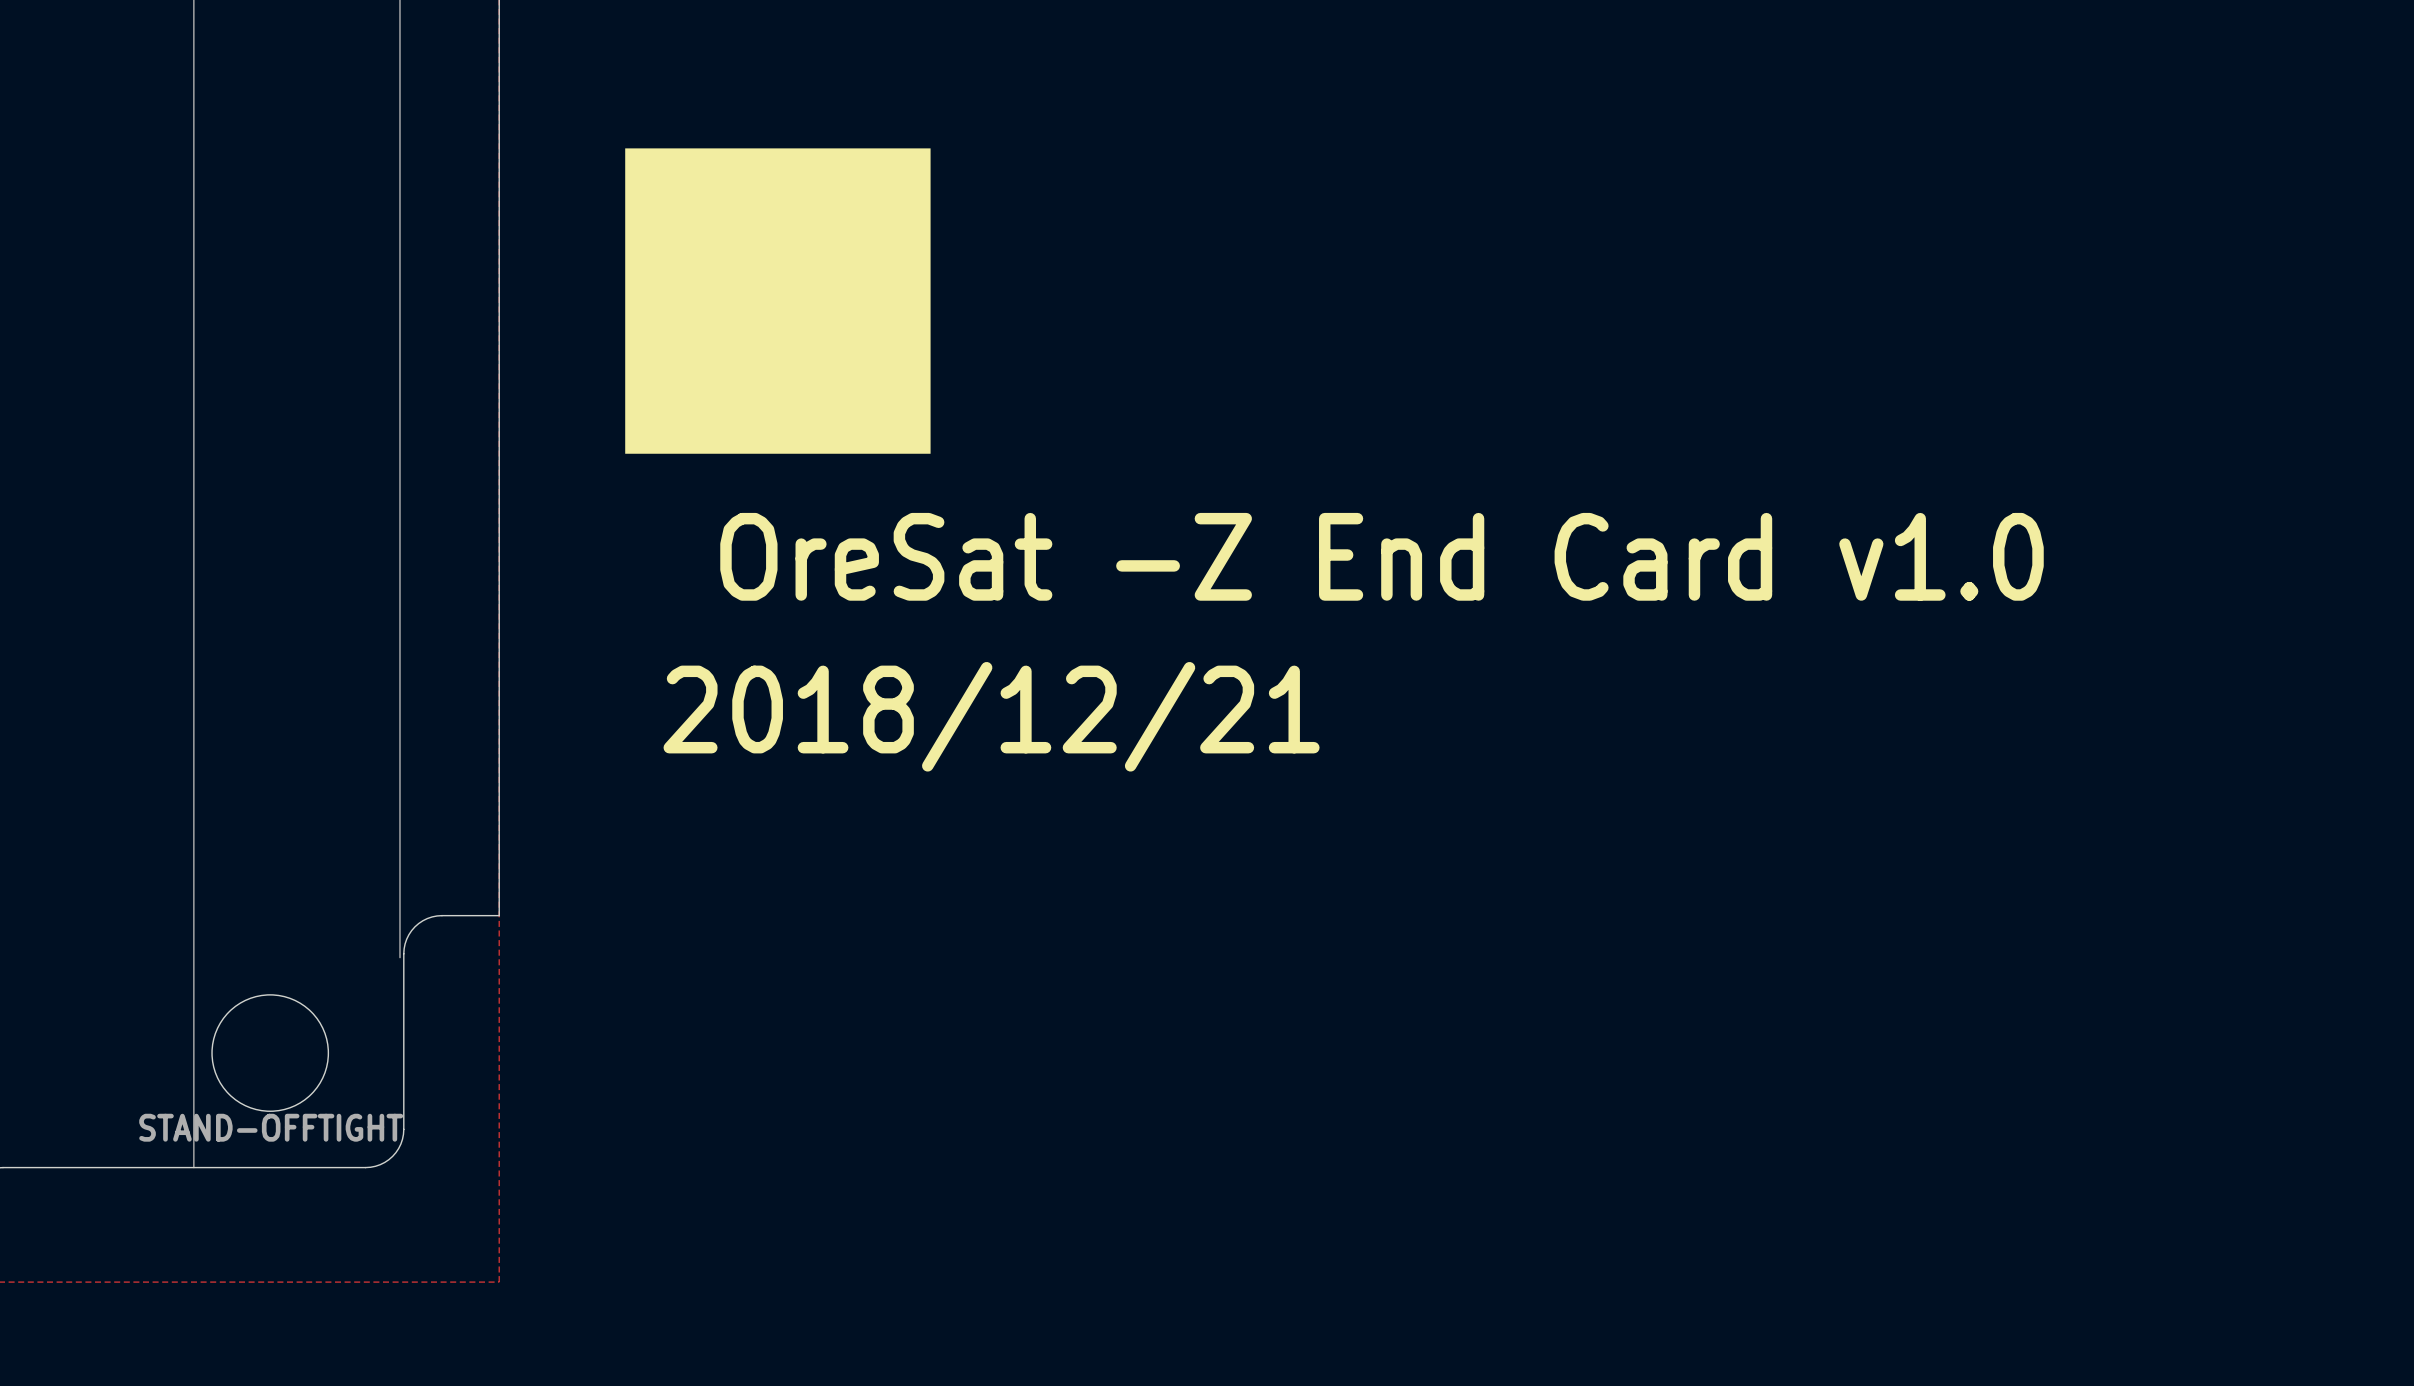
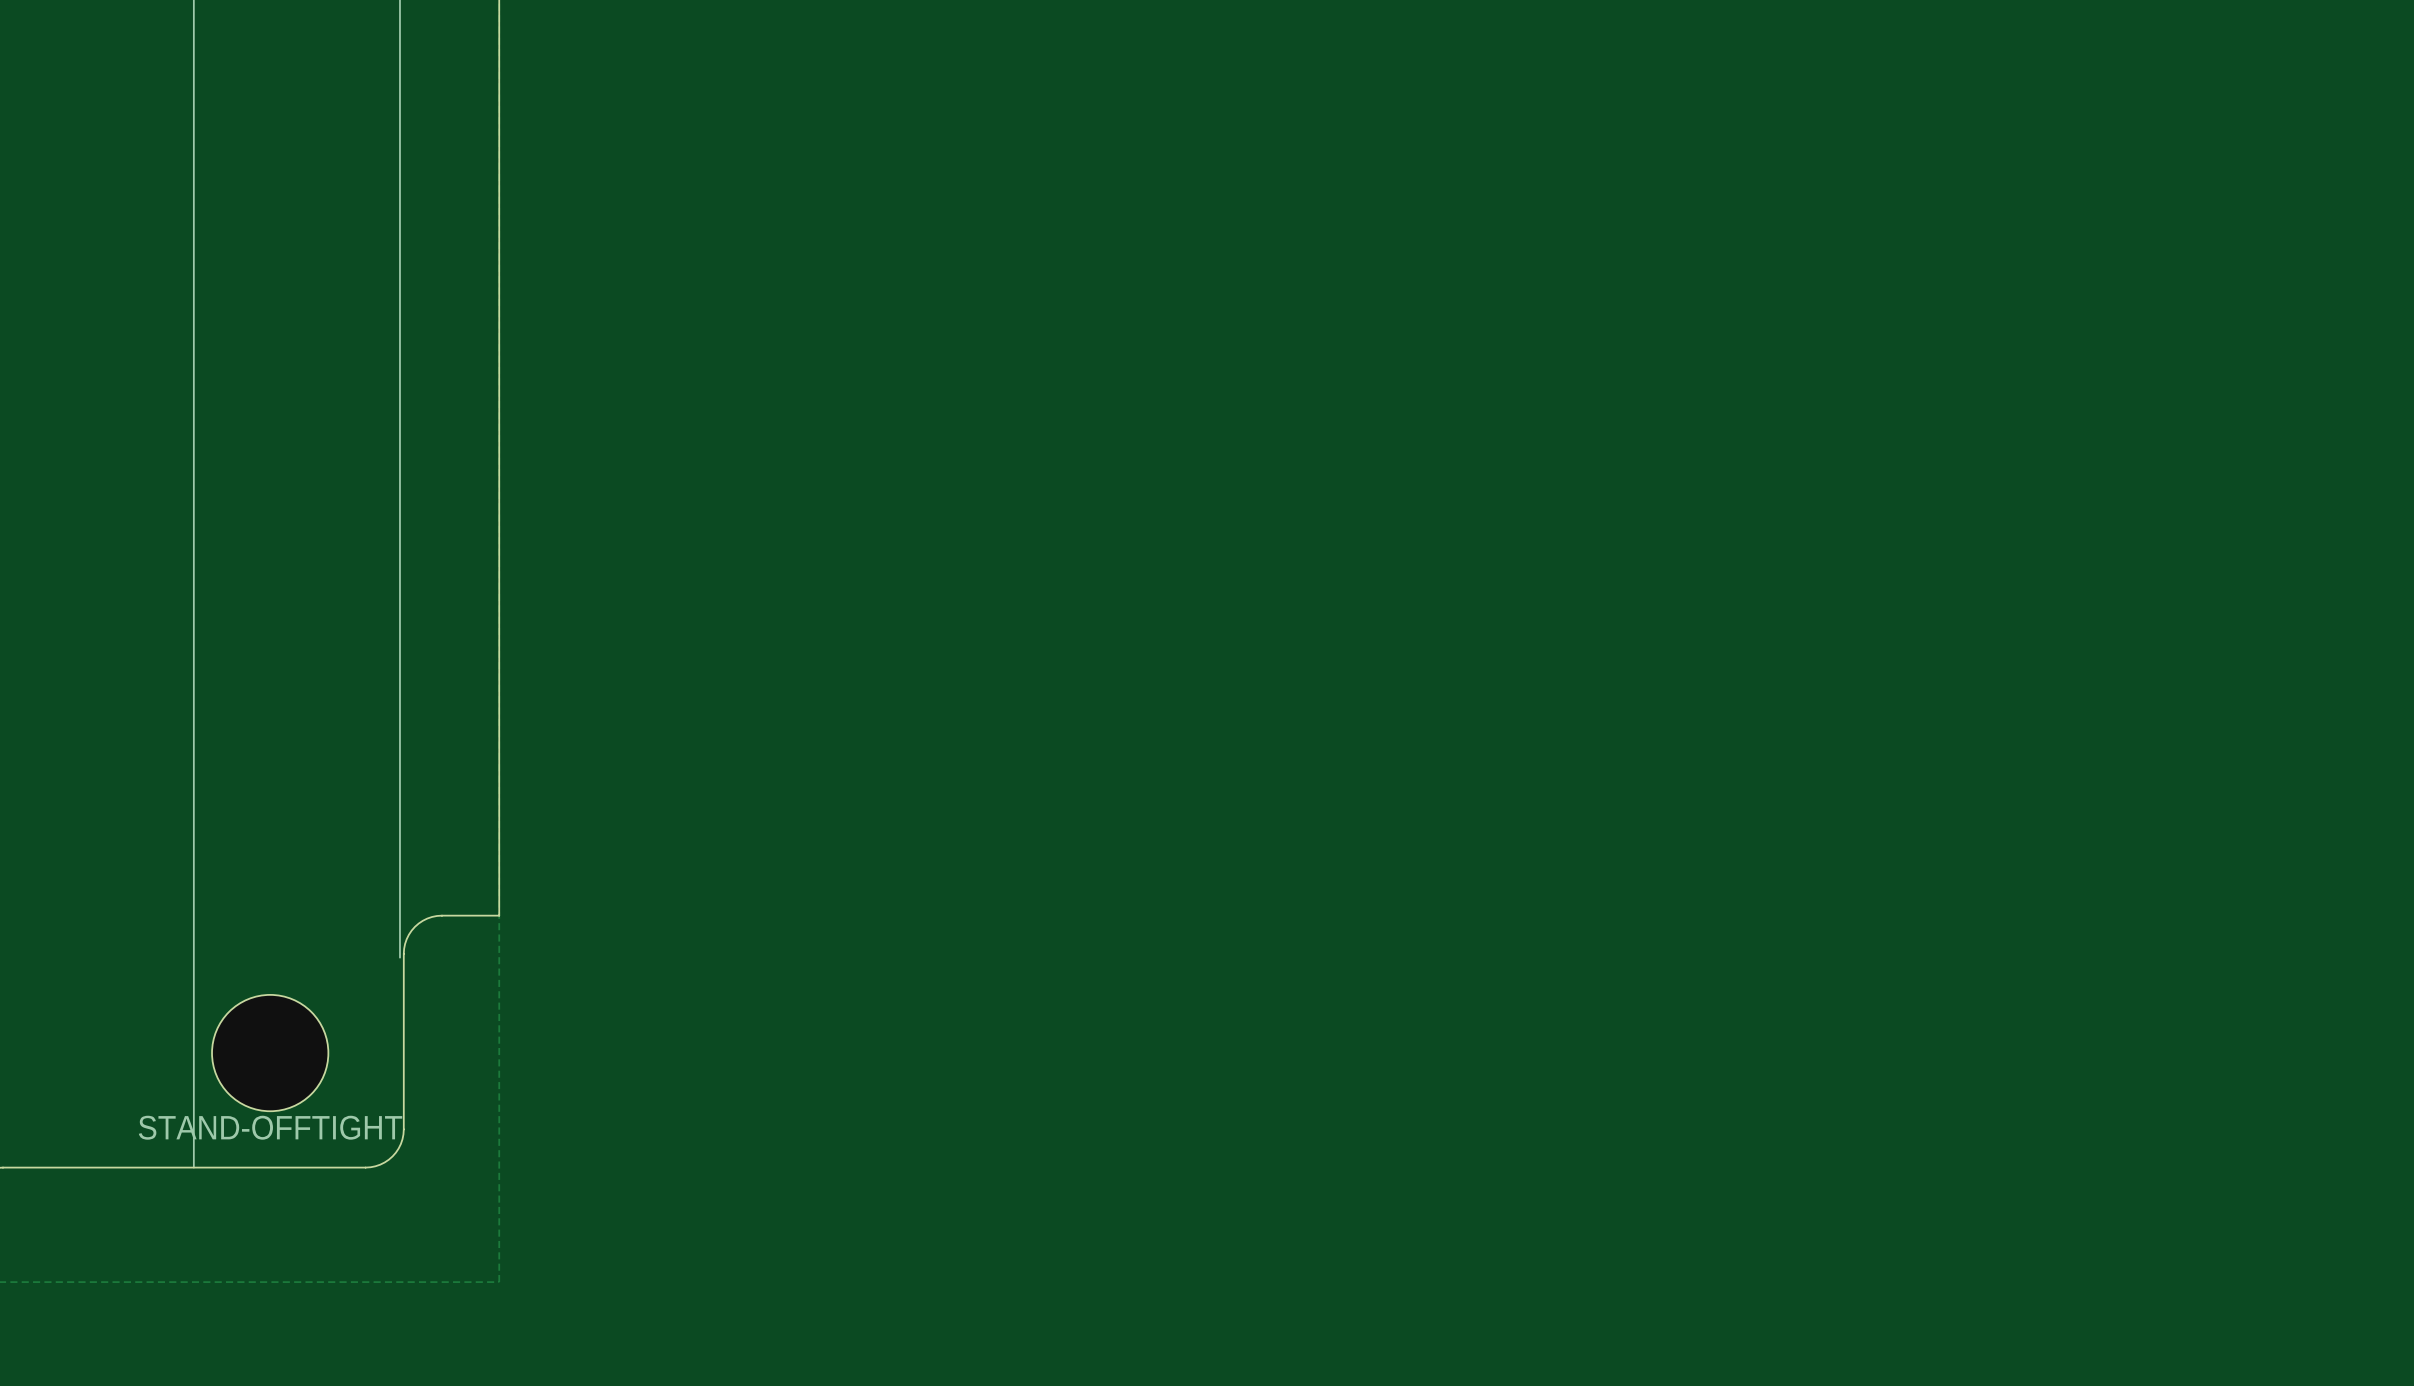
drawing: [625, 148, 931, 454] -> none
text: OreSat -Z End Card v1.0 (1382, 556) -> none
text: 2018/12/21 (991, 716) -> none

